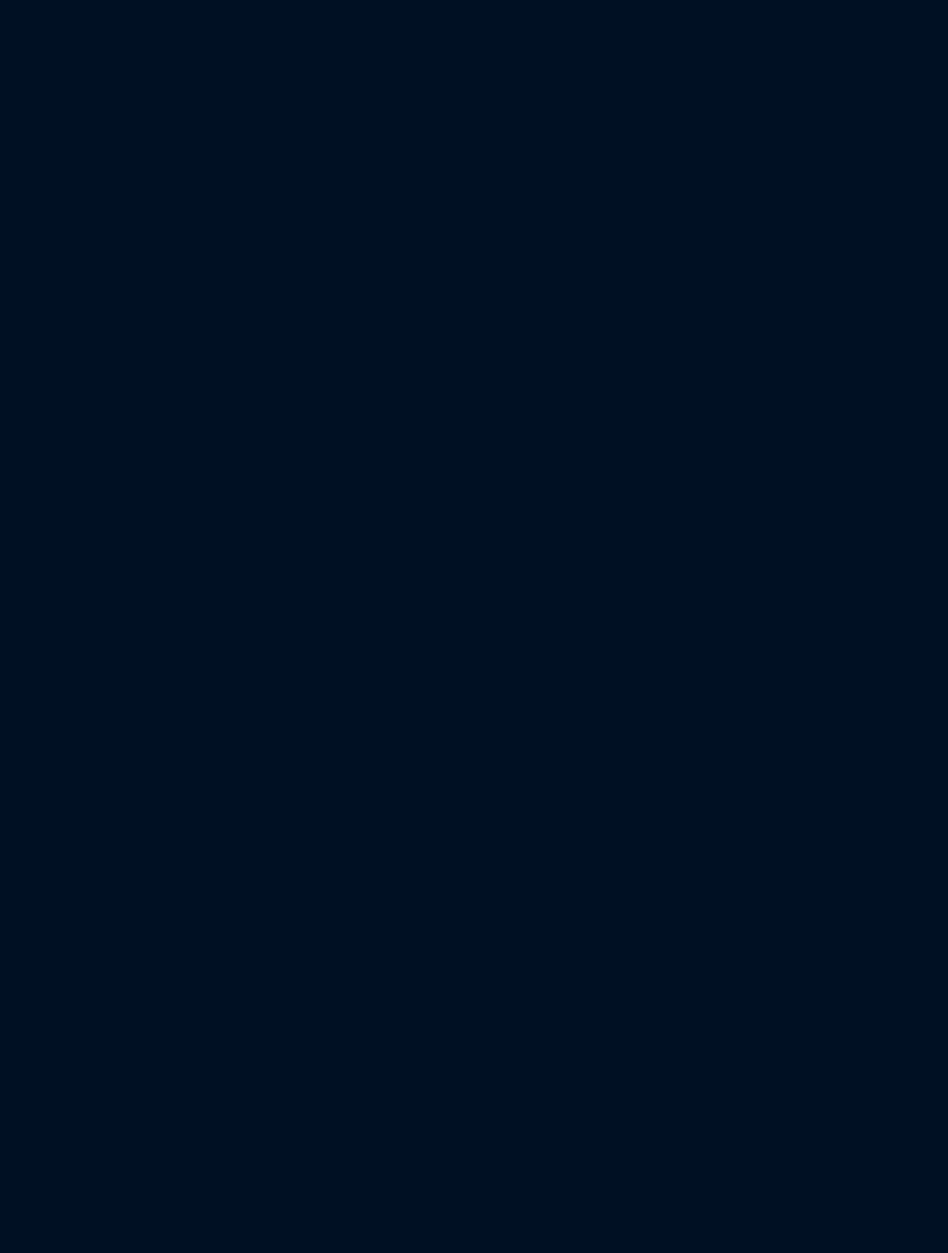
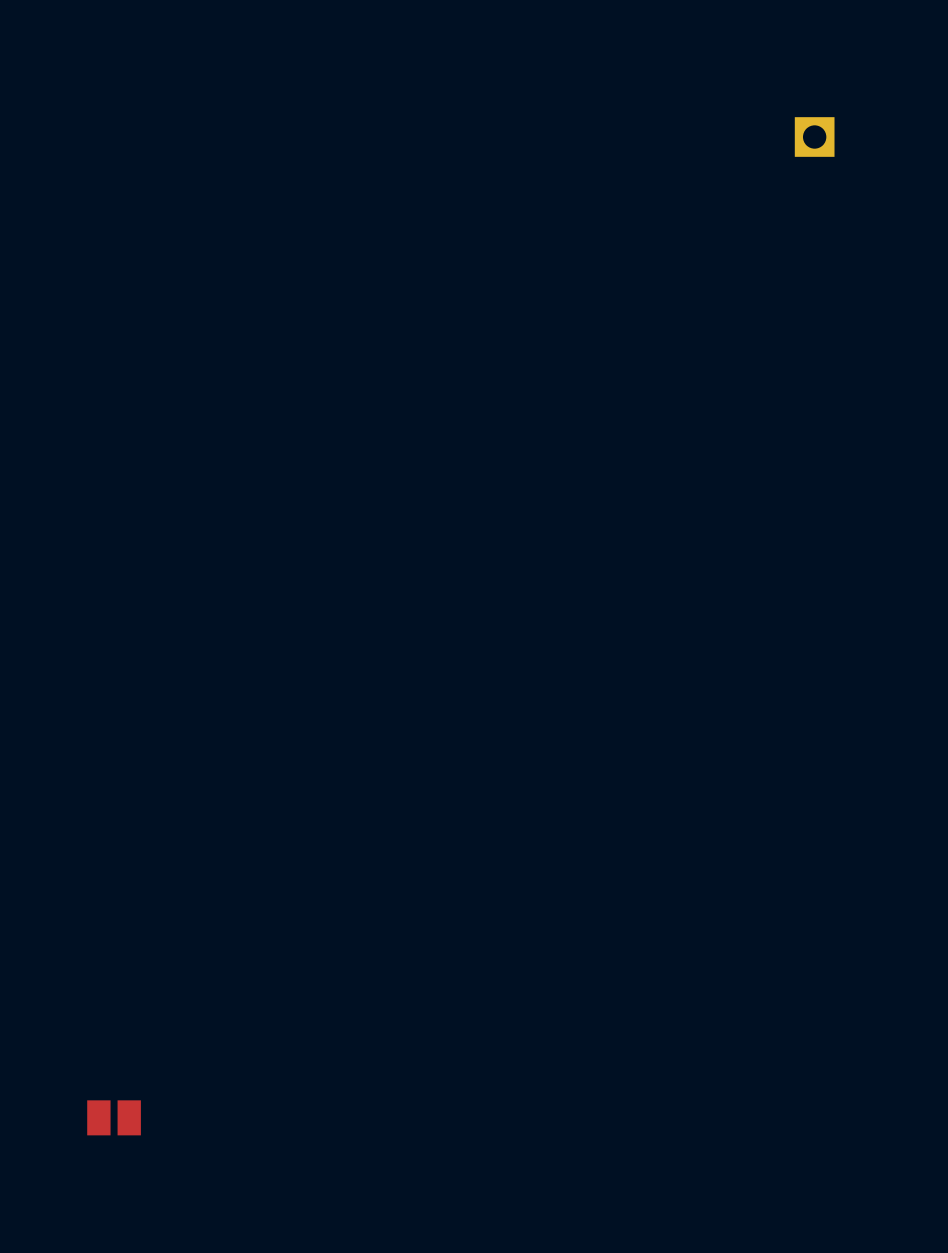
part: none -> (814, 137)
part: none -> (114, 1117)

